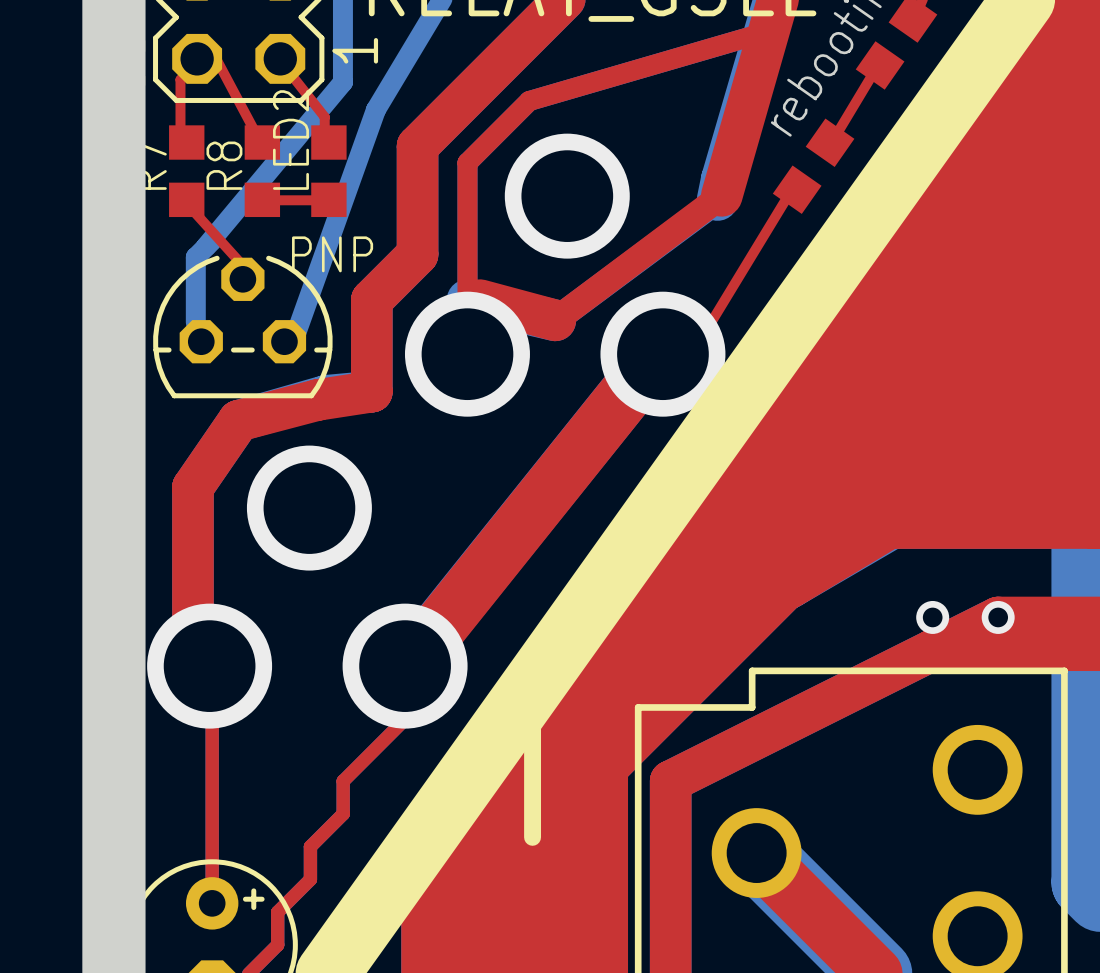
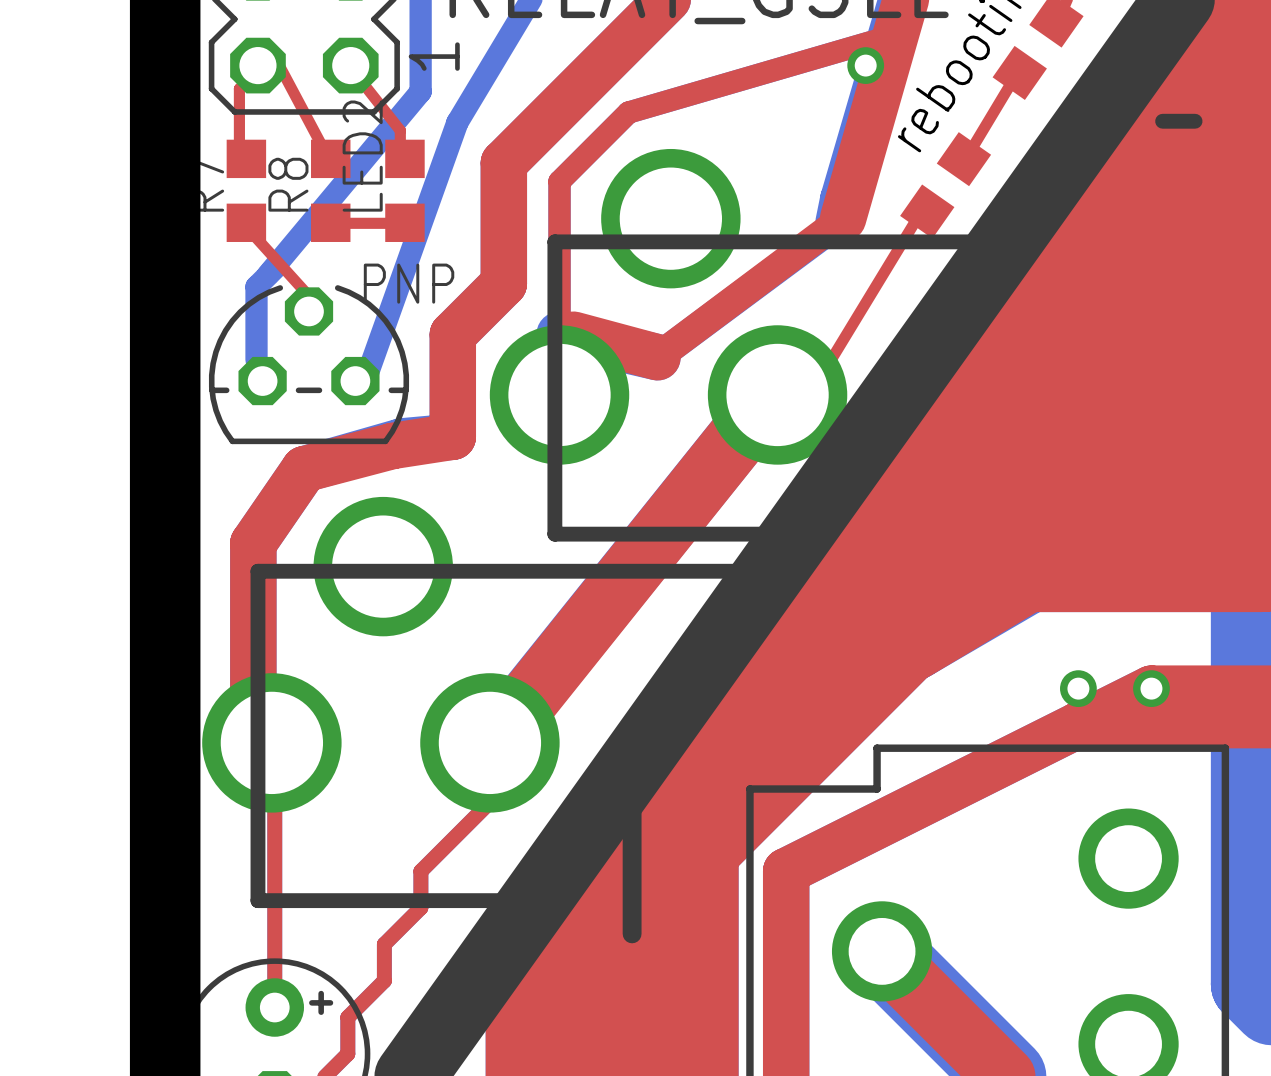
via: none -> (865, 65)
line: none -> (1162, 121) (1195, 121)
line: none -> (977, 241) (554, 241) (554, 534) (777, 534)
line: none -> (759, 571) (257, 571) (257, 900) (554, 900)

